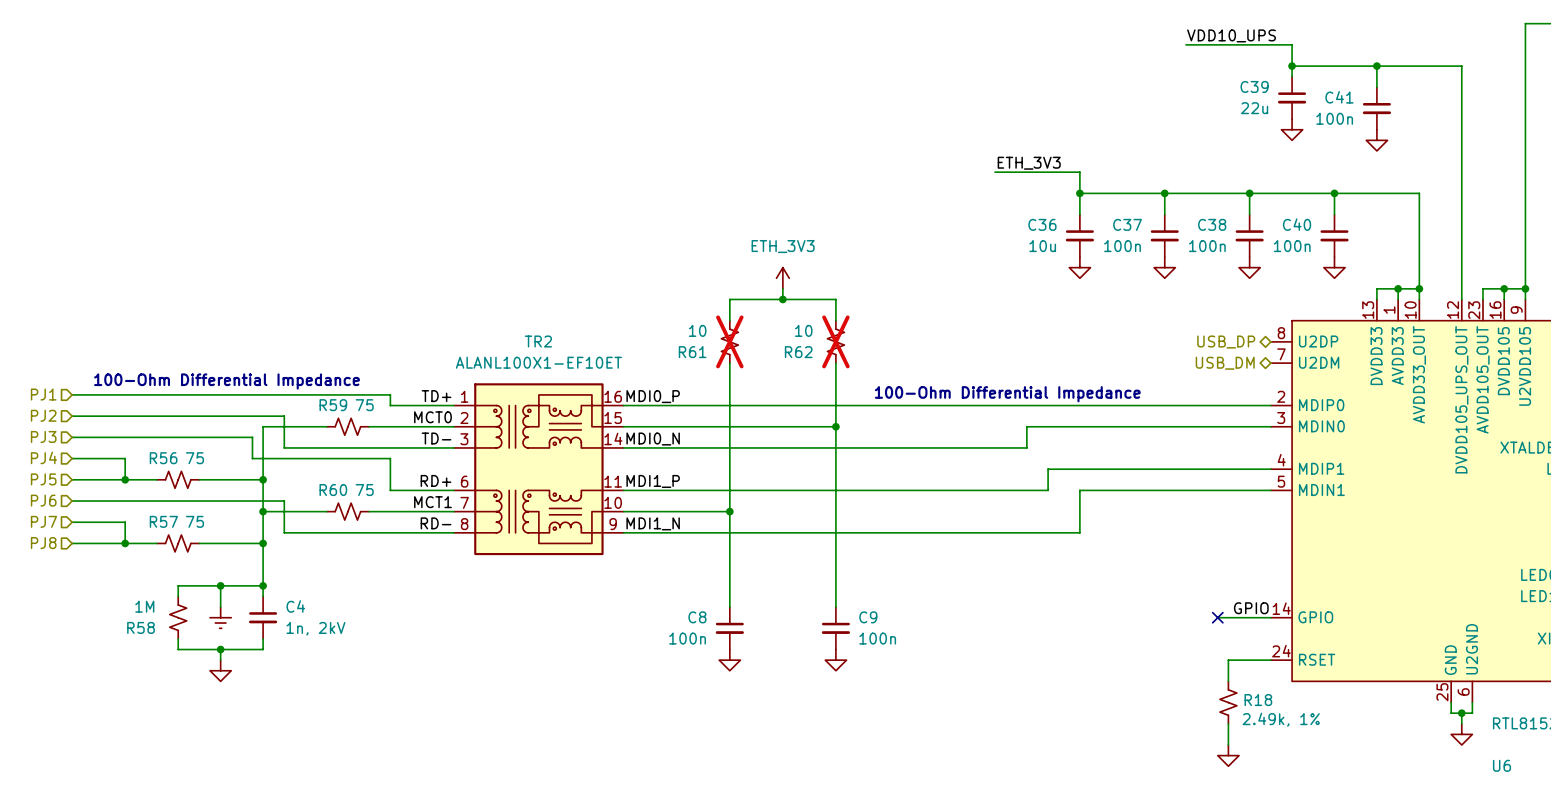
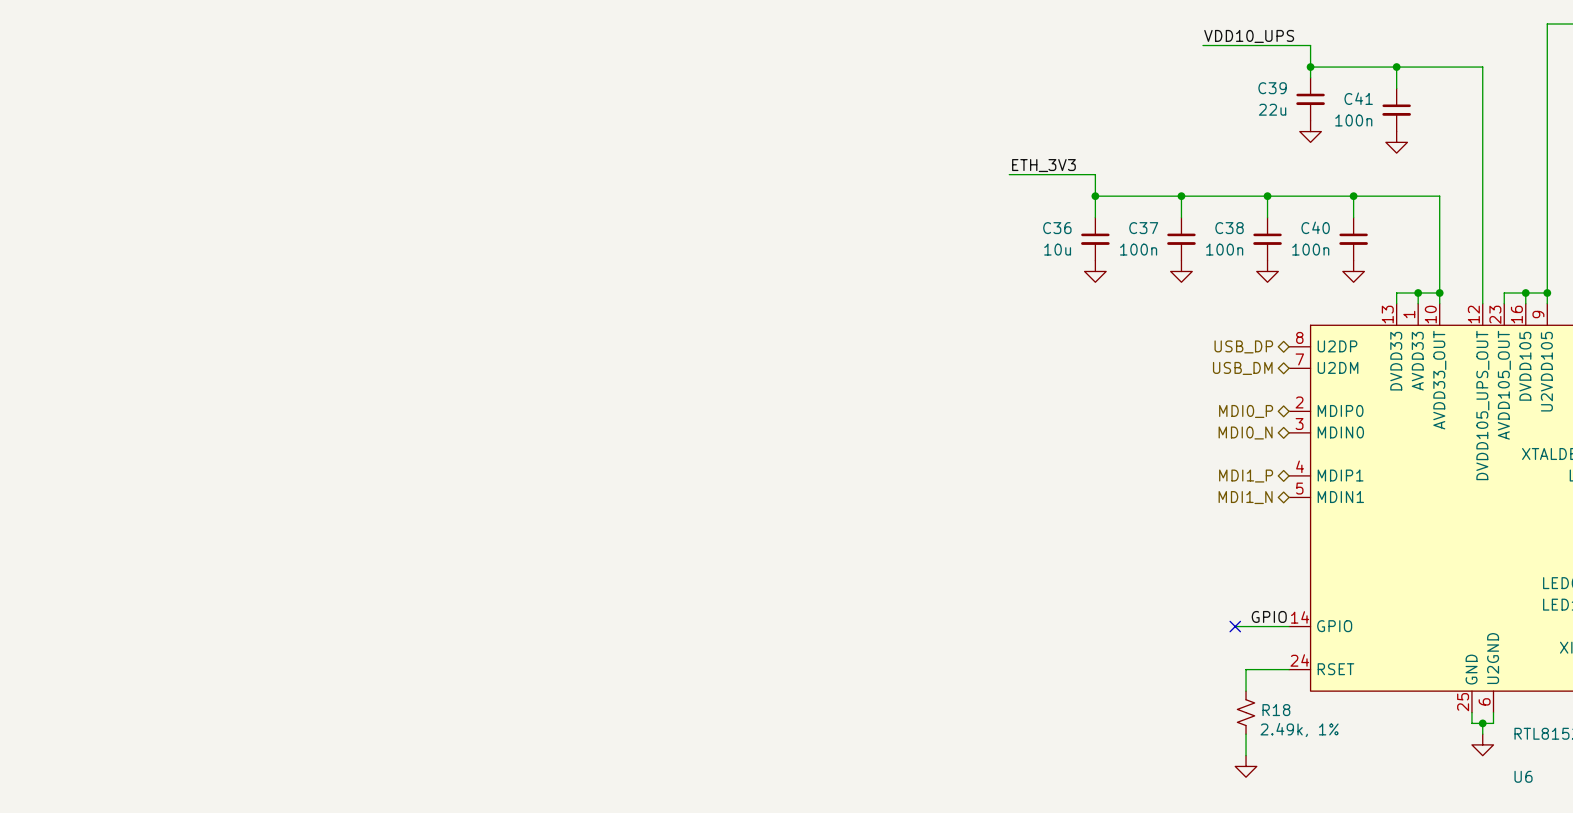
power symbol: ETH_3V3 (782, 278) -> none
wire: (782, 288) (782, 299) -> none
junction: (782, 299) -> none
wire: (729, 320) (729, 299) (835, 299) (835, 320) -> none
R61: 10 (729, 341) -> none
R62: 10 (835, 341) -> none
wire: (729, 363) (729, 607) -> none
wire: (835, 363) (835, 607) -> none
text: 100-Ohm Differential Impedance (227, 381) -> none
hierarchical label: PJ1 (43, 394) -> none
wire: (72, 394) (390, 394) (390, 405) (454, 405) -> none
text: 100-Ohm Differential Impedance (1007, 394) -> none
label: TD+ (436, 396) -> none
label: MDI0_P (653, 396) -> none
wire: (623, 405) (1270, 405) -> none
hierarchical label: none -> MDI0_P (1246, 411)
hierarchical label: PJ2 (43, 415) -> none
wire: (72, 416) (284, 416) (284, 447) (454, 447) -> none
label: MCT0 (432, 417) -> none
wire: (326, 426) (263, 426) (263, 596) -> none
R59: 75 (347, 426) -> none
wire: (369, 426) (454, 426) -> none
wire: (623, 426) (835, 426) -> none
junction: (835, 426) -> none
hierarchical label: none -> MDI0_N (1245, 432)
wire: (1270, 426) (1026, 426) (1026, 447) (623, 447) -> none
hierarchical label: PJ3 (43, 436) -> none
wire: (72, 437) (252, 437) (252, 458) (390, 458) (390, 490) (454, 490) -> none
label: TD- (436, 438) -> none
label: MDI0_N (653, 439) -> none
hierarchical label: PJ4 (43, 457) -> none
wire: (72, 458) (125, 458) (125, 479) -> none
TR2: ALANL100X1-EF10ET (538, 469) -> none
hierarchical label: none -> MDI1_P (1246, 476)
wire: (1270, 469) (1048, 469) (1048, 490) (623, 490) -> none
hierarchical label: PJ5 (43, 479) -> none
wire: (72, 479) (157, 479) -> none
junction: (125, 479) -> none
R56: 75 (178, 479) -> none
wire: (199, 479) (263, 479) -> none
junction: (263, 479) -> none
label: RD+ (436, 480) -> none
label: MDI1_P (653, 481) -> none
hierarchical label: none -> MDI1_N (1245, 497)
wire: (1270, 490) (1079, 490) (1079, 532) (623, 532) -> none
hierarchical label: PJ6 (43, 500) -> none
wire: (72, 501) (284, 501) (284, 532) (454, 532) -> none
label: MCT1 (432, 502) -> none
wire: (263, 511) (326, 511) -> none
junction: (263, 511) -> none
R60: 75 (347, 511) -> none
wire: (369, 511) (454, 511) -> none
wire: (623, 511) (729, 511) -> none
junction: (729, 511) -> none
hierarchical label: PJ7 (43, 521) -> none
wire: (72, 522) (125, 522) (125, 543) -> none
label: RD- (436, 523) -> none
label: MDI1_N (653, 523) -> none
hierarchical label: PJ8 (43, 543) -> none
wire: (72, 543) (157, 543) -> none
junction: (125, 543) -> none
R57: 75 (178, 543) -> none
wire: (199, 543) (263, 543) -> none
junction: (263, 543) -> none
wire: (220, 585) (220, 607) -> none
junction: (220, 585) -> none
wire: (263, 585) (178, 585) (178, 596) -> none
junction: (263, 585) -> none
R58: 1M (178, 617) -> none
power symbol: (220, 617) -> none
C4: 1n, 2kV (263, 617) -> none
C8: 100n (729, 628) -> none
C9: 100n (835, 628) -> none
wire: (178, 638) (178, 649) (263, 649) (263, 638) -> none
wire: (220, 649) (220, 660) -> none
junction: (220, 649) -> none
power symbol: (729, 660) -> none
power symbol: (835, 660) -> none
power symbol: (220, 670) -> none

